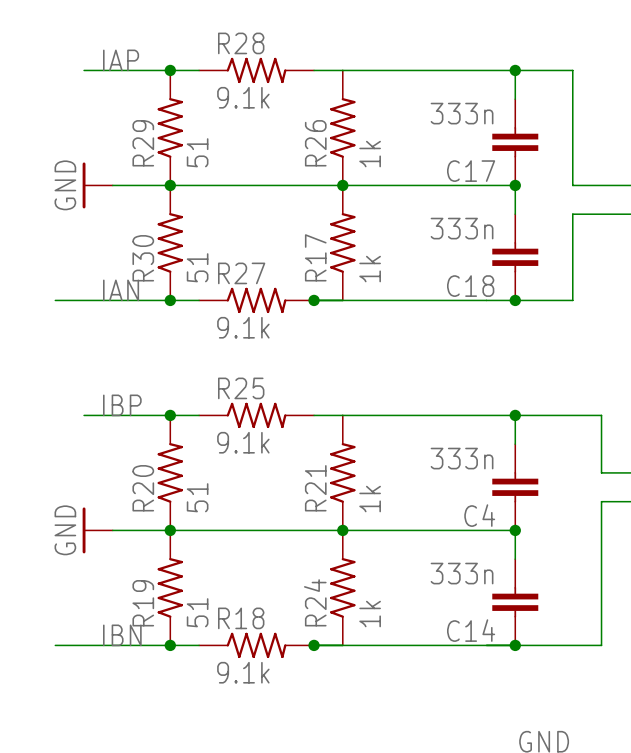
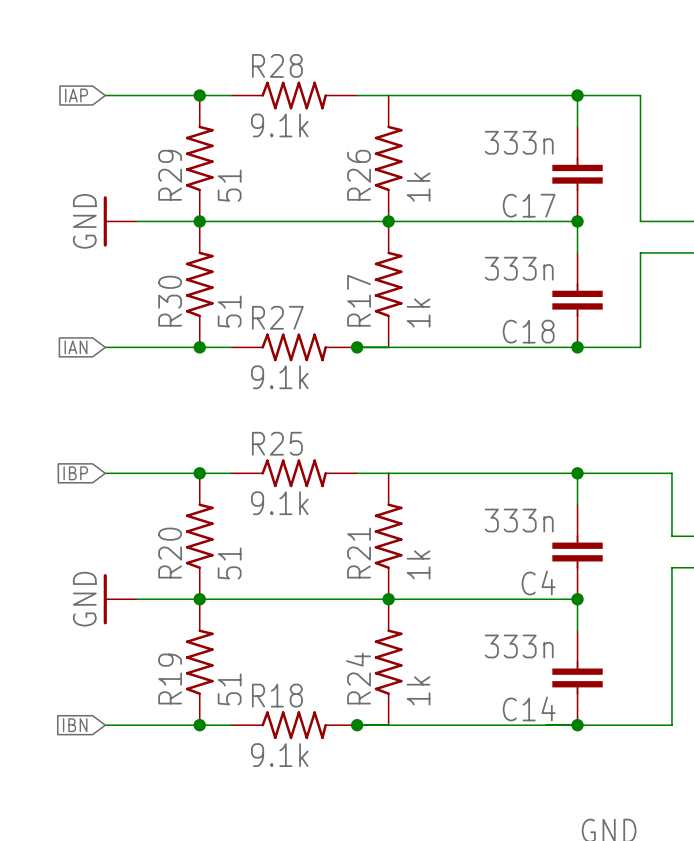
label: IAP (121, 60) -> none
global label: none -> IAP (76, 95)
label: IAN (121, 290) -> none
wire: (55, 300) (84, 300) -> none
global label: none -> IAN (76, 347)
label: IBP (122, 405) -> none
global label: none -> IBP (75, 473)
label: IBN (122, 635) -> none
wire: (55, 645) (84, 645) -> none
global label: none -> IBN (75, 725)

